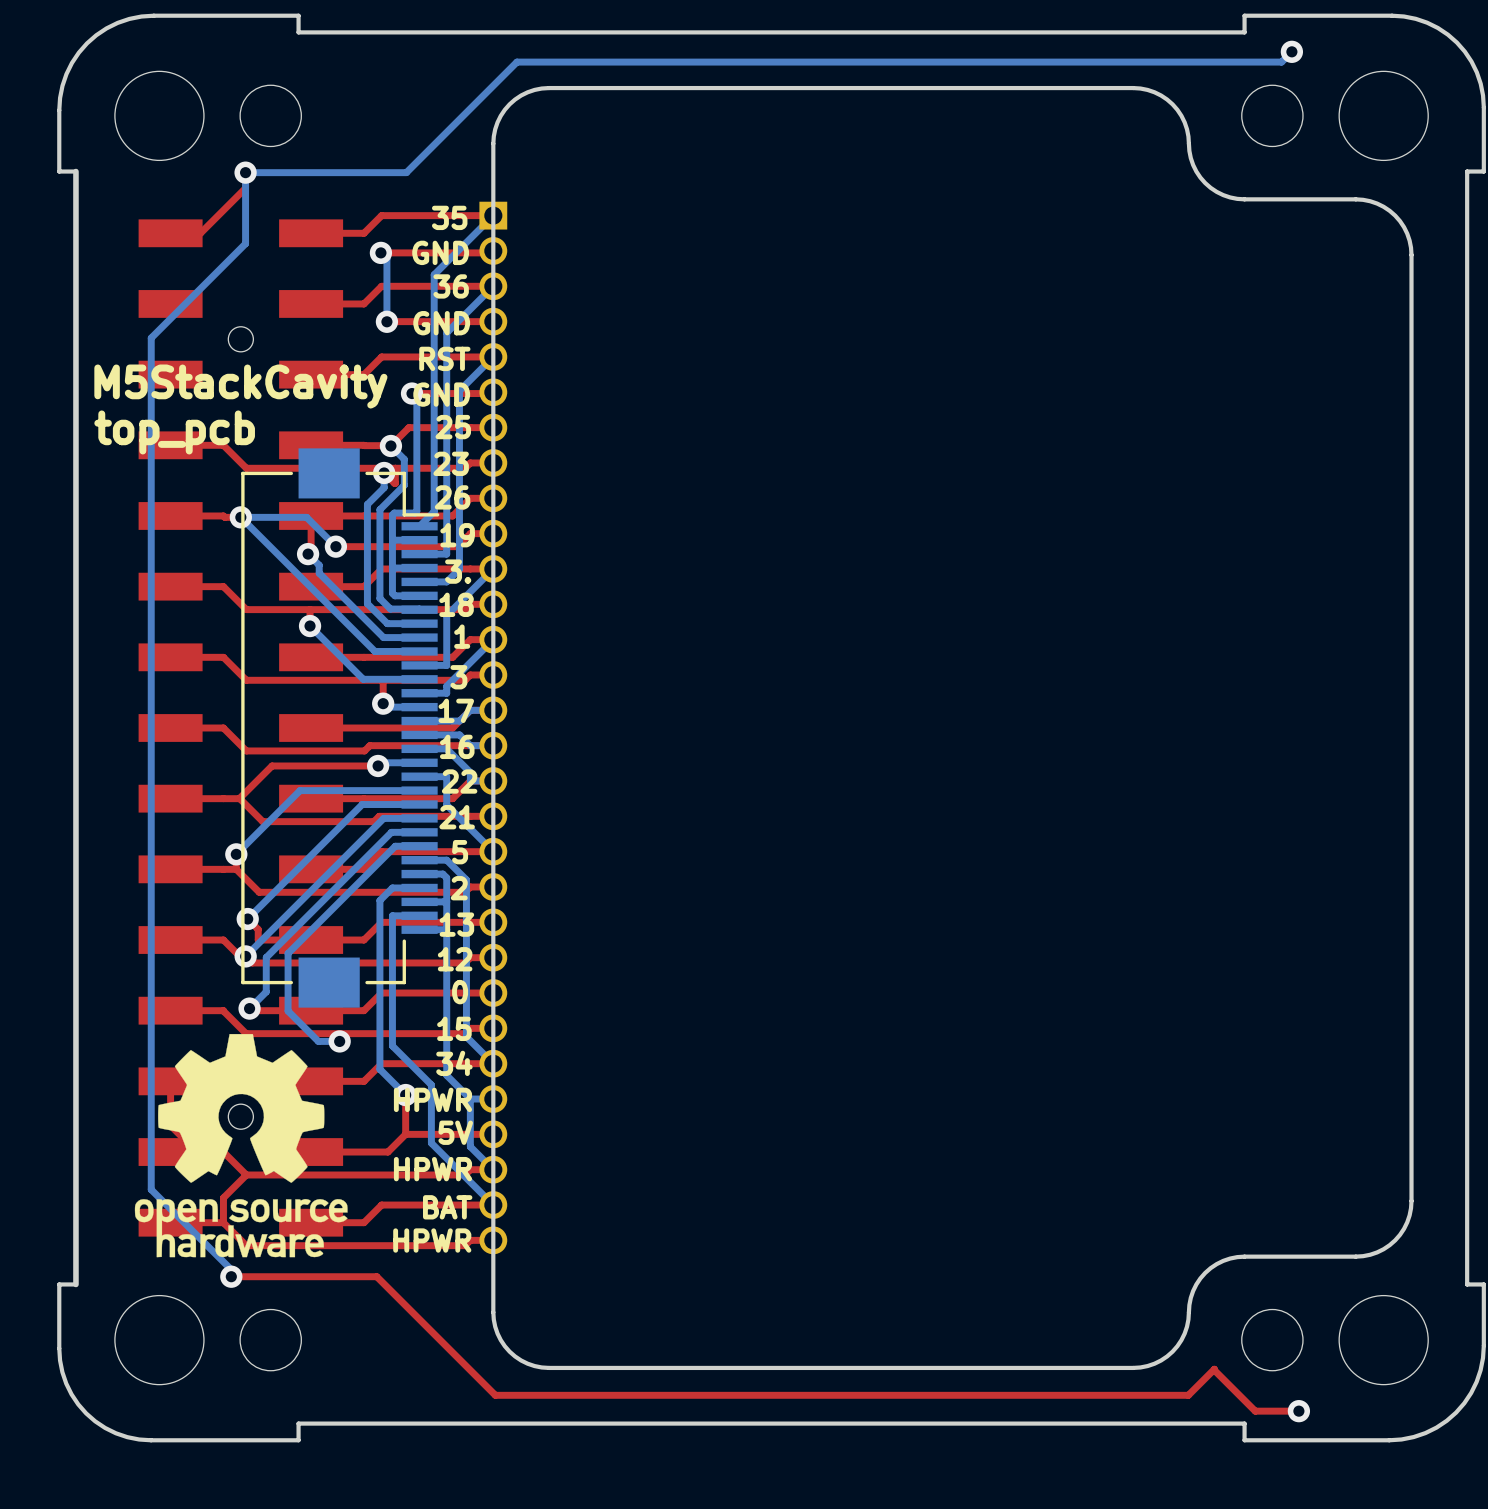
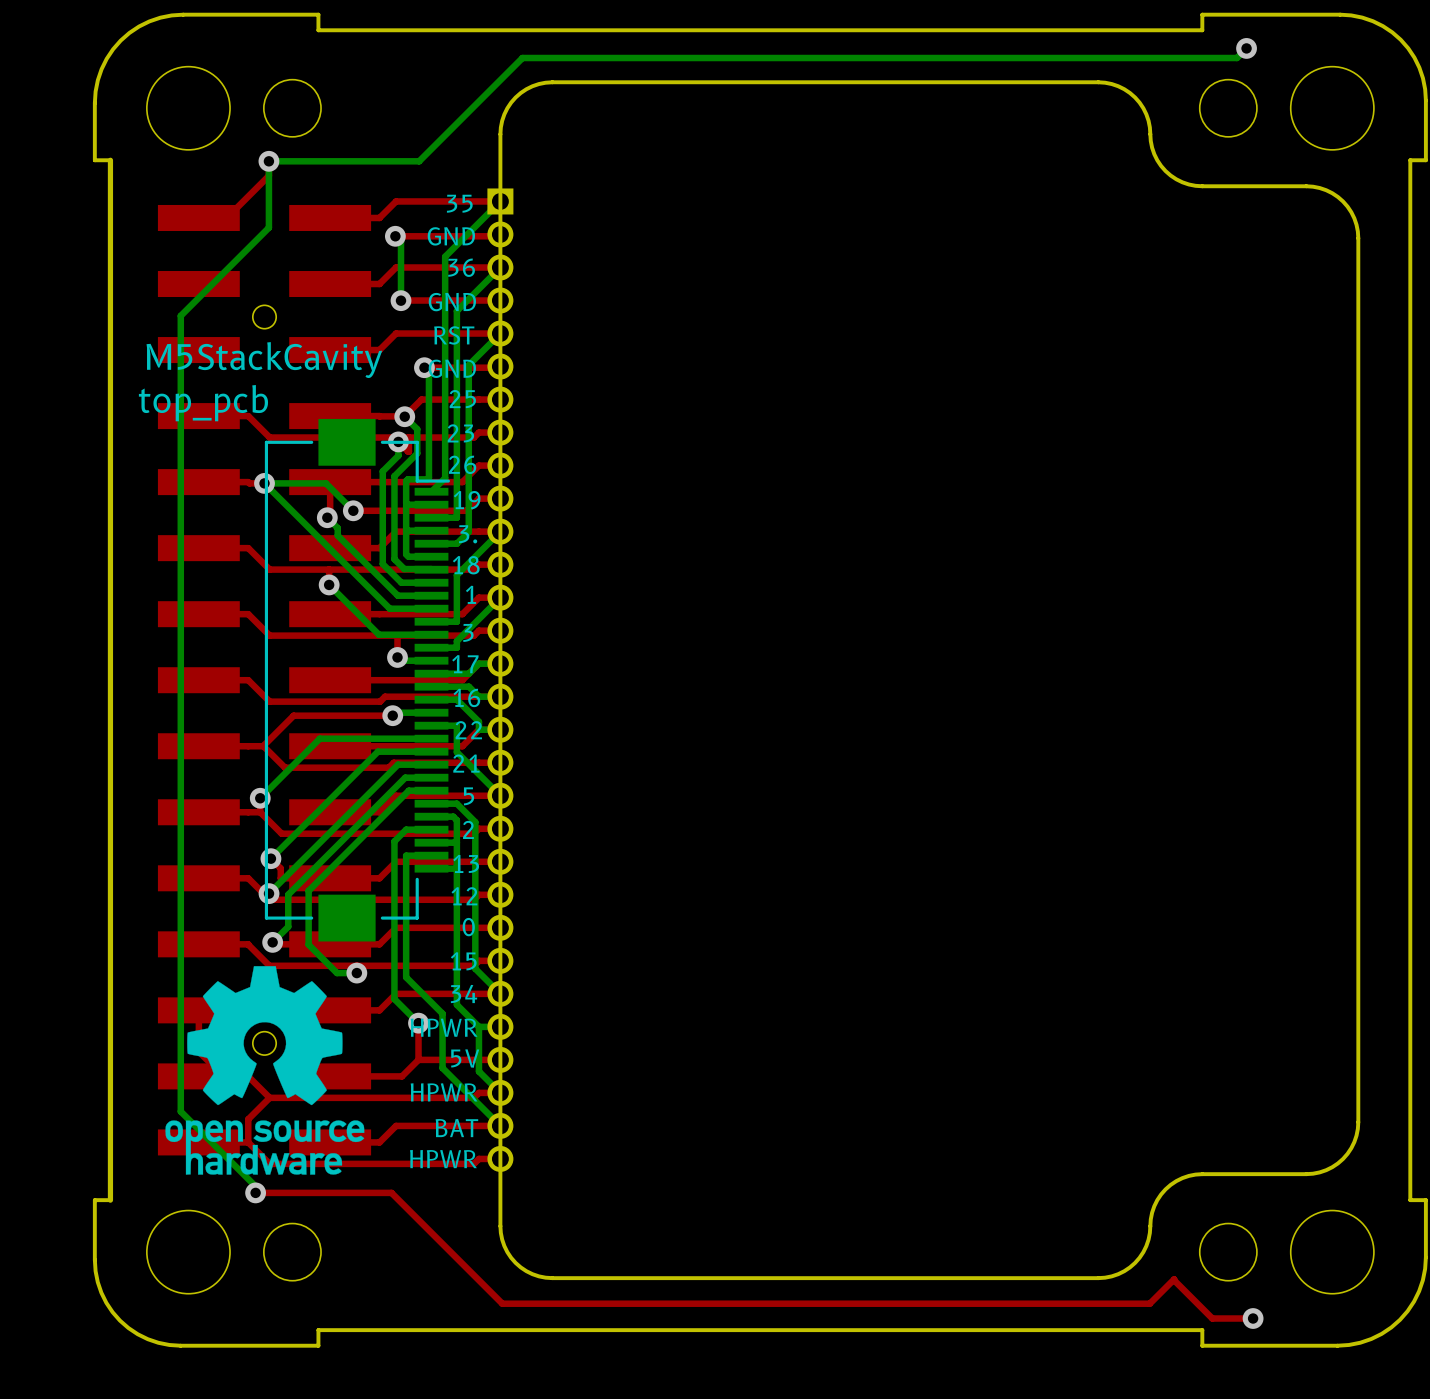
part footprint: [138, 219, 344, 1237] -> [157, 204, 372, 1156]

